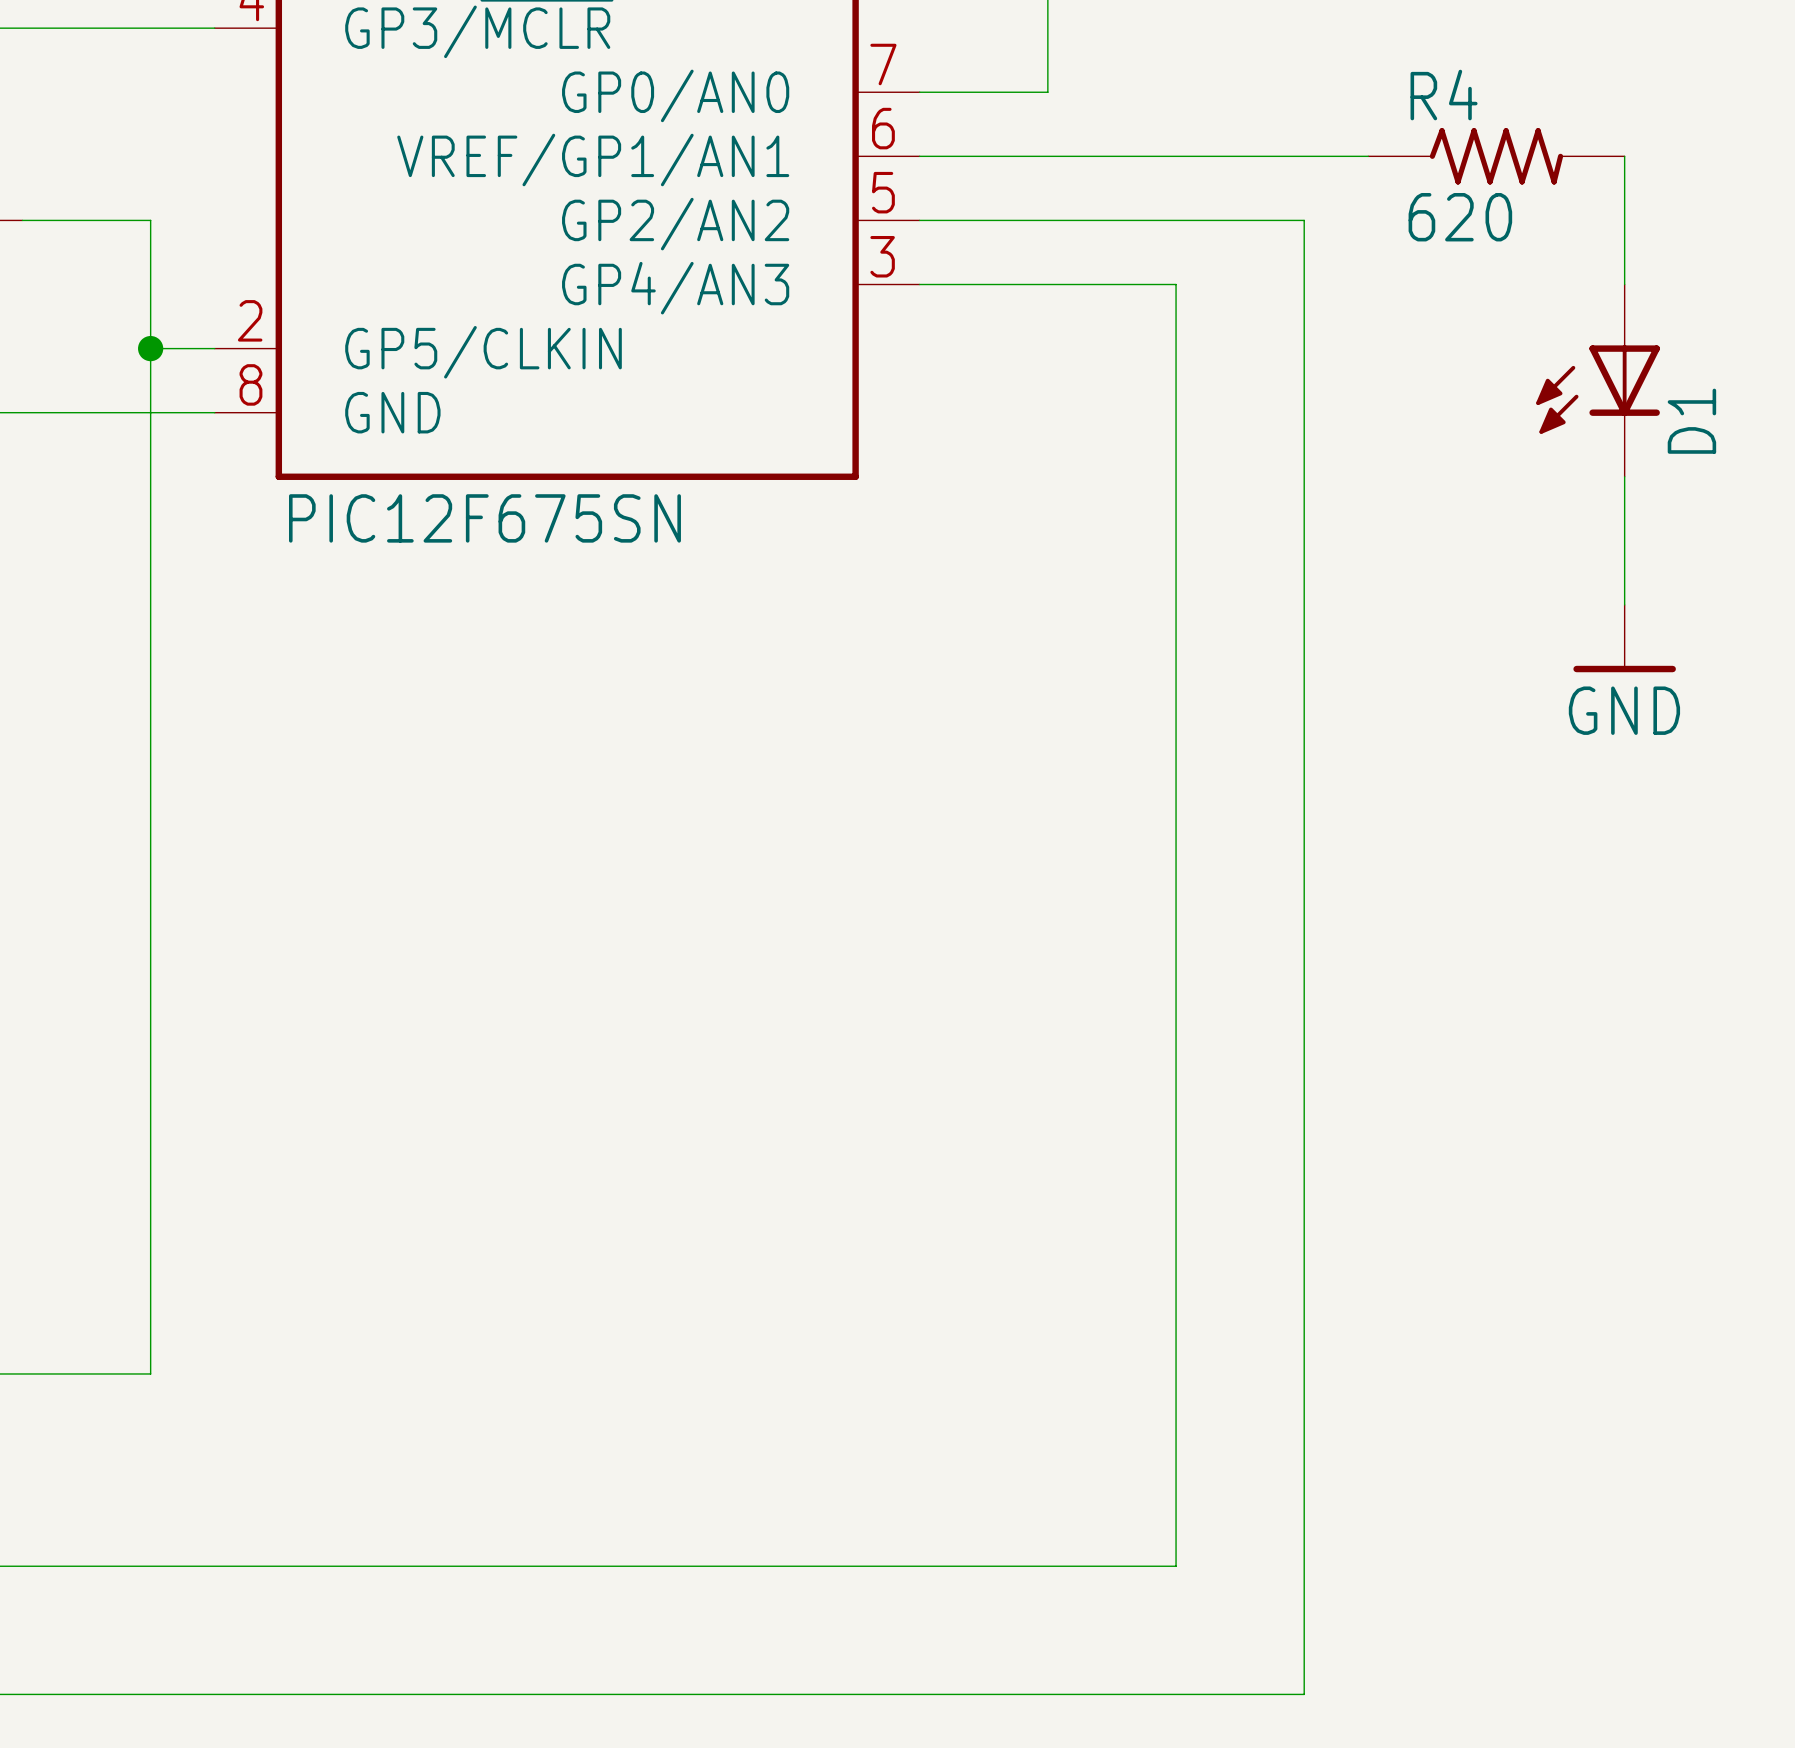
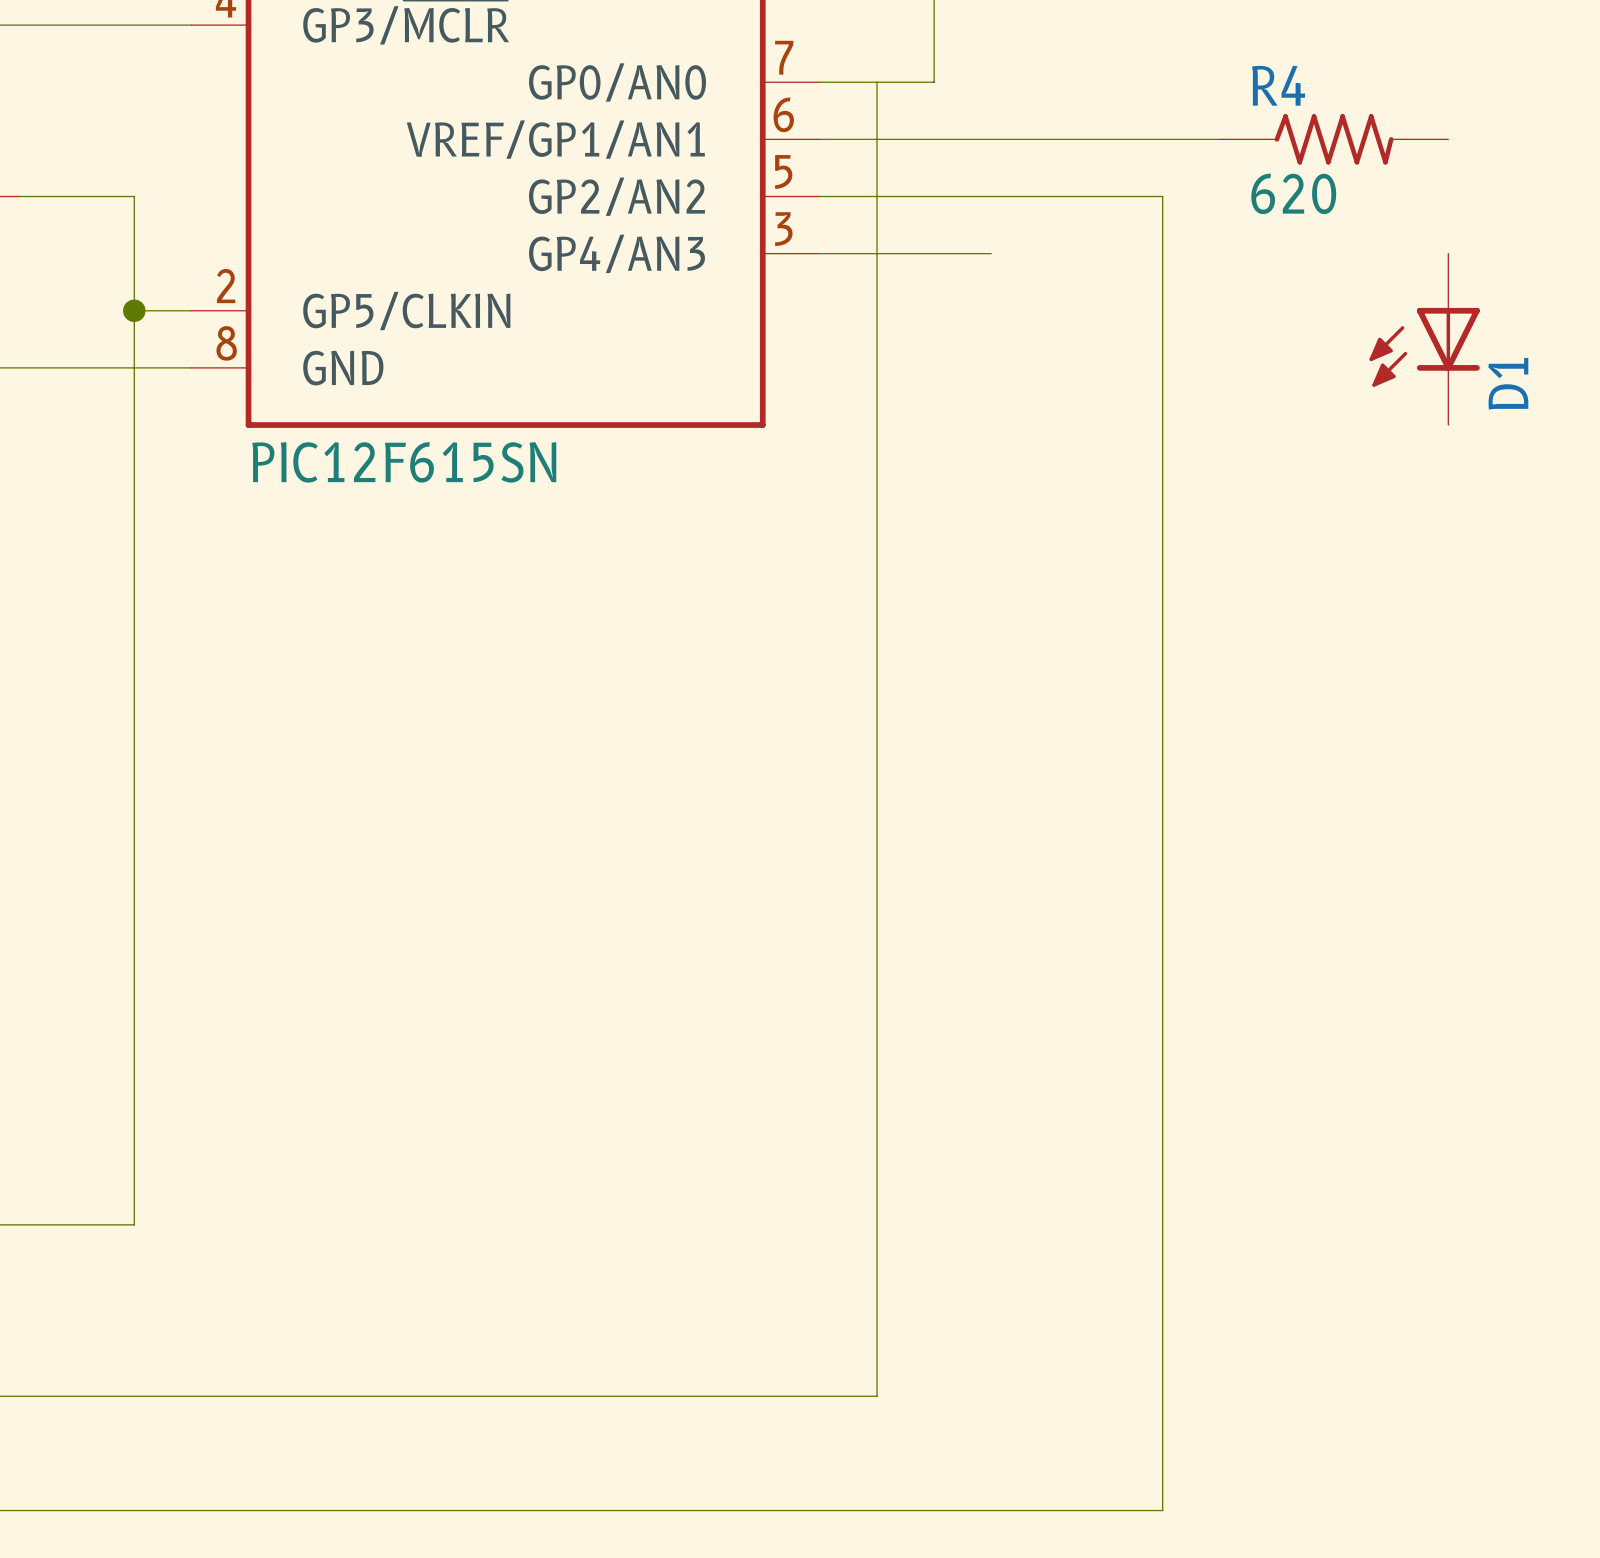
wire: (1624, 156) (1624, 284) -> none
wire: (1111, 284) (1176, 284) (1176, 1566) (983, 1566) -> (877, 82) (877, 1396)
wire: (1624, 476) (1624, 604) -> none
part value: PIC12F675SN (484, 518) -> PIC12F615SN (404, 462)
power symbol: GND (1624, 638) -> none

